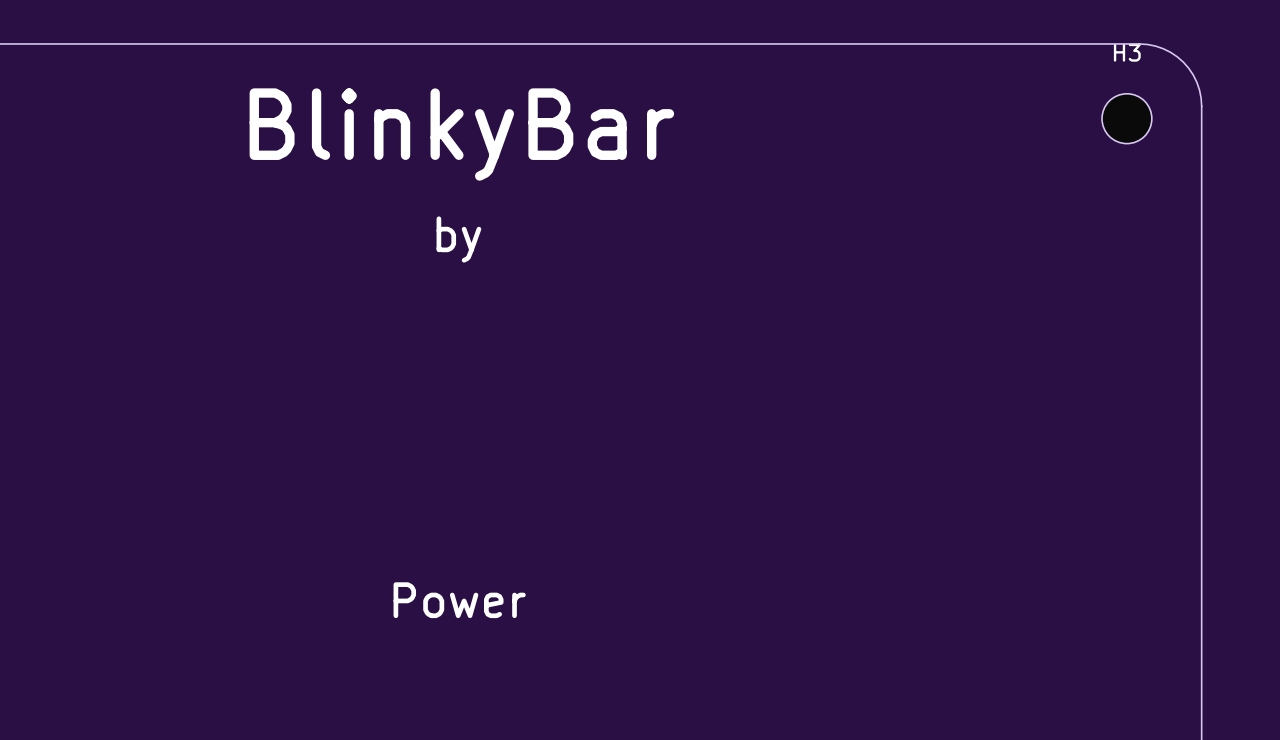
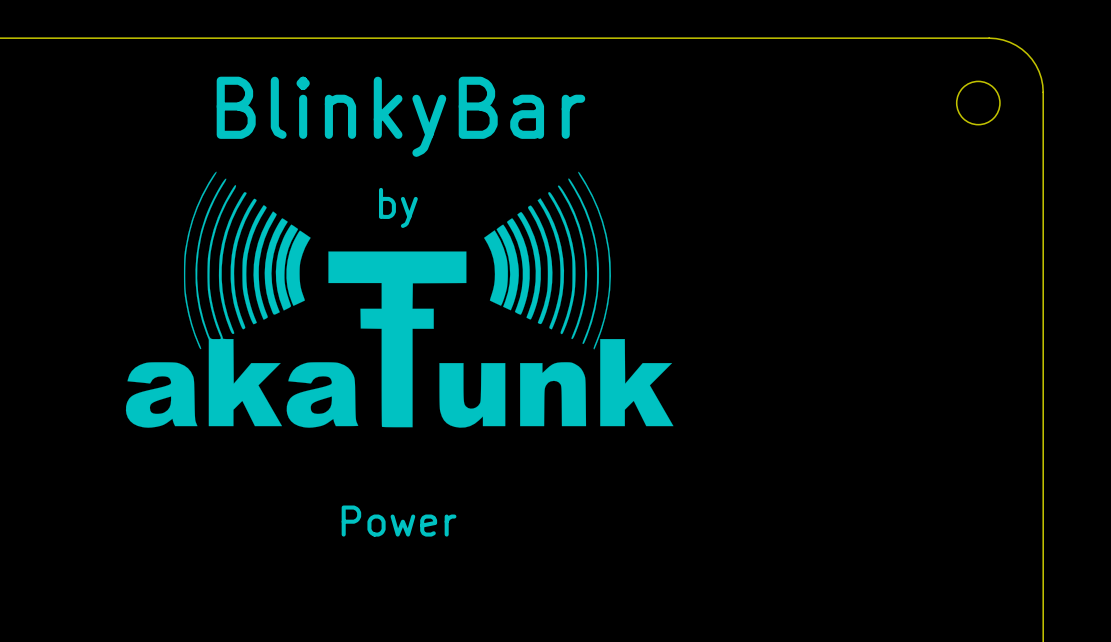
H3 name: H3 (1127, 52) -> none
drawing: none -> [125, 171, 674, 428]

